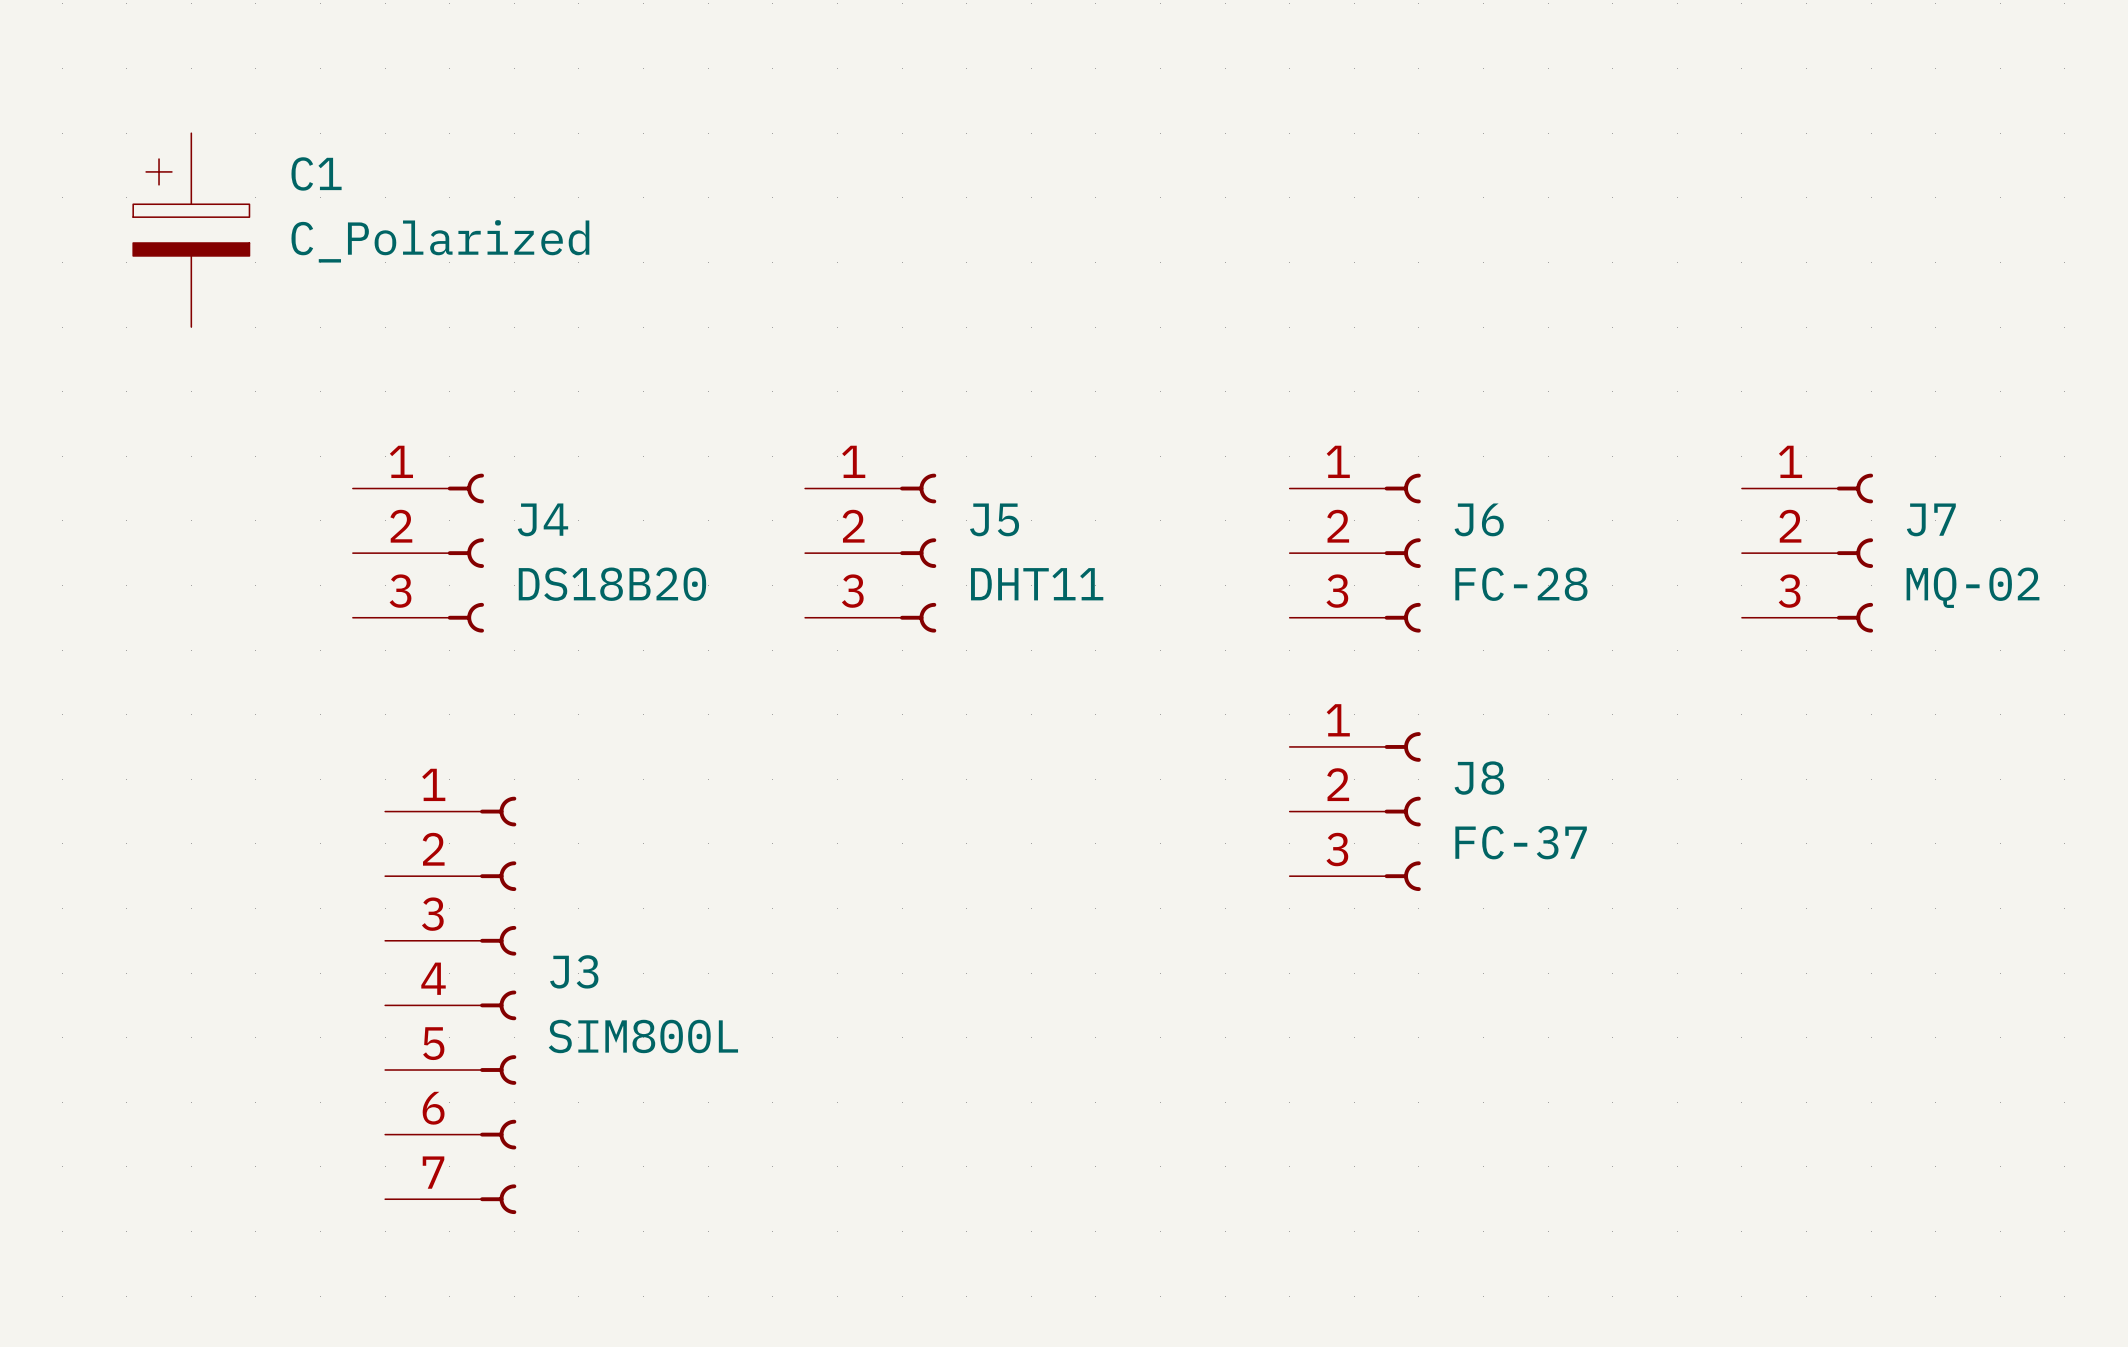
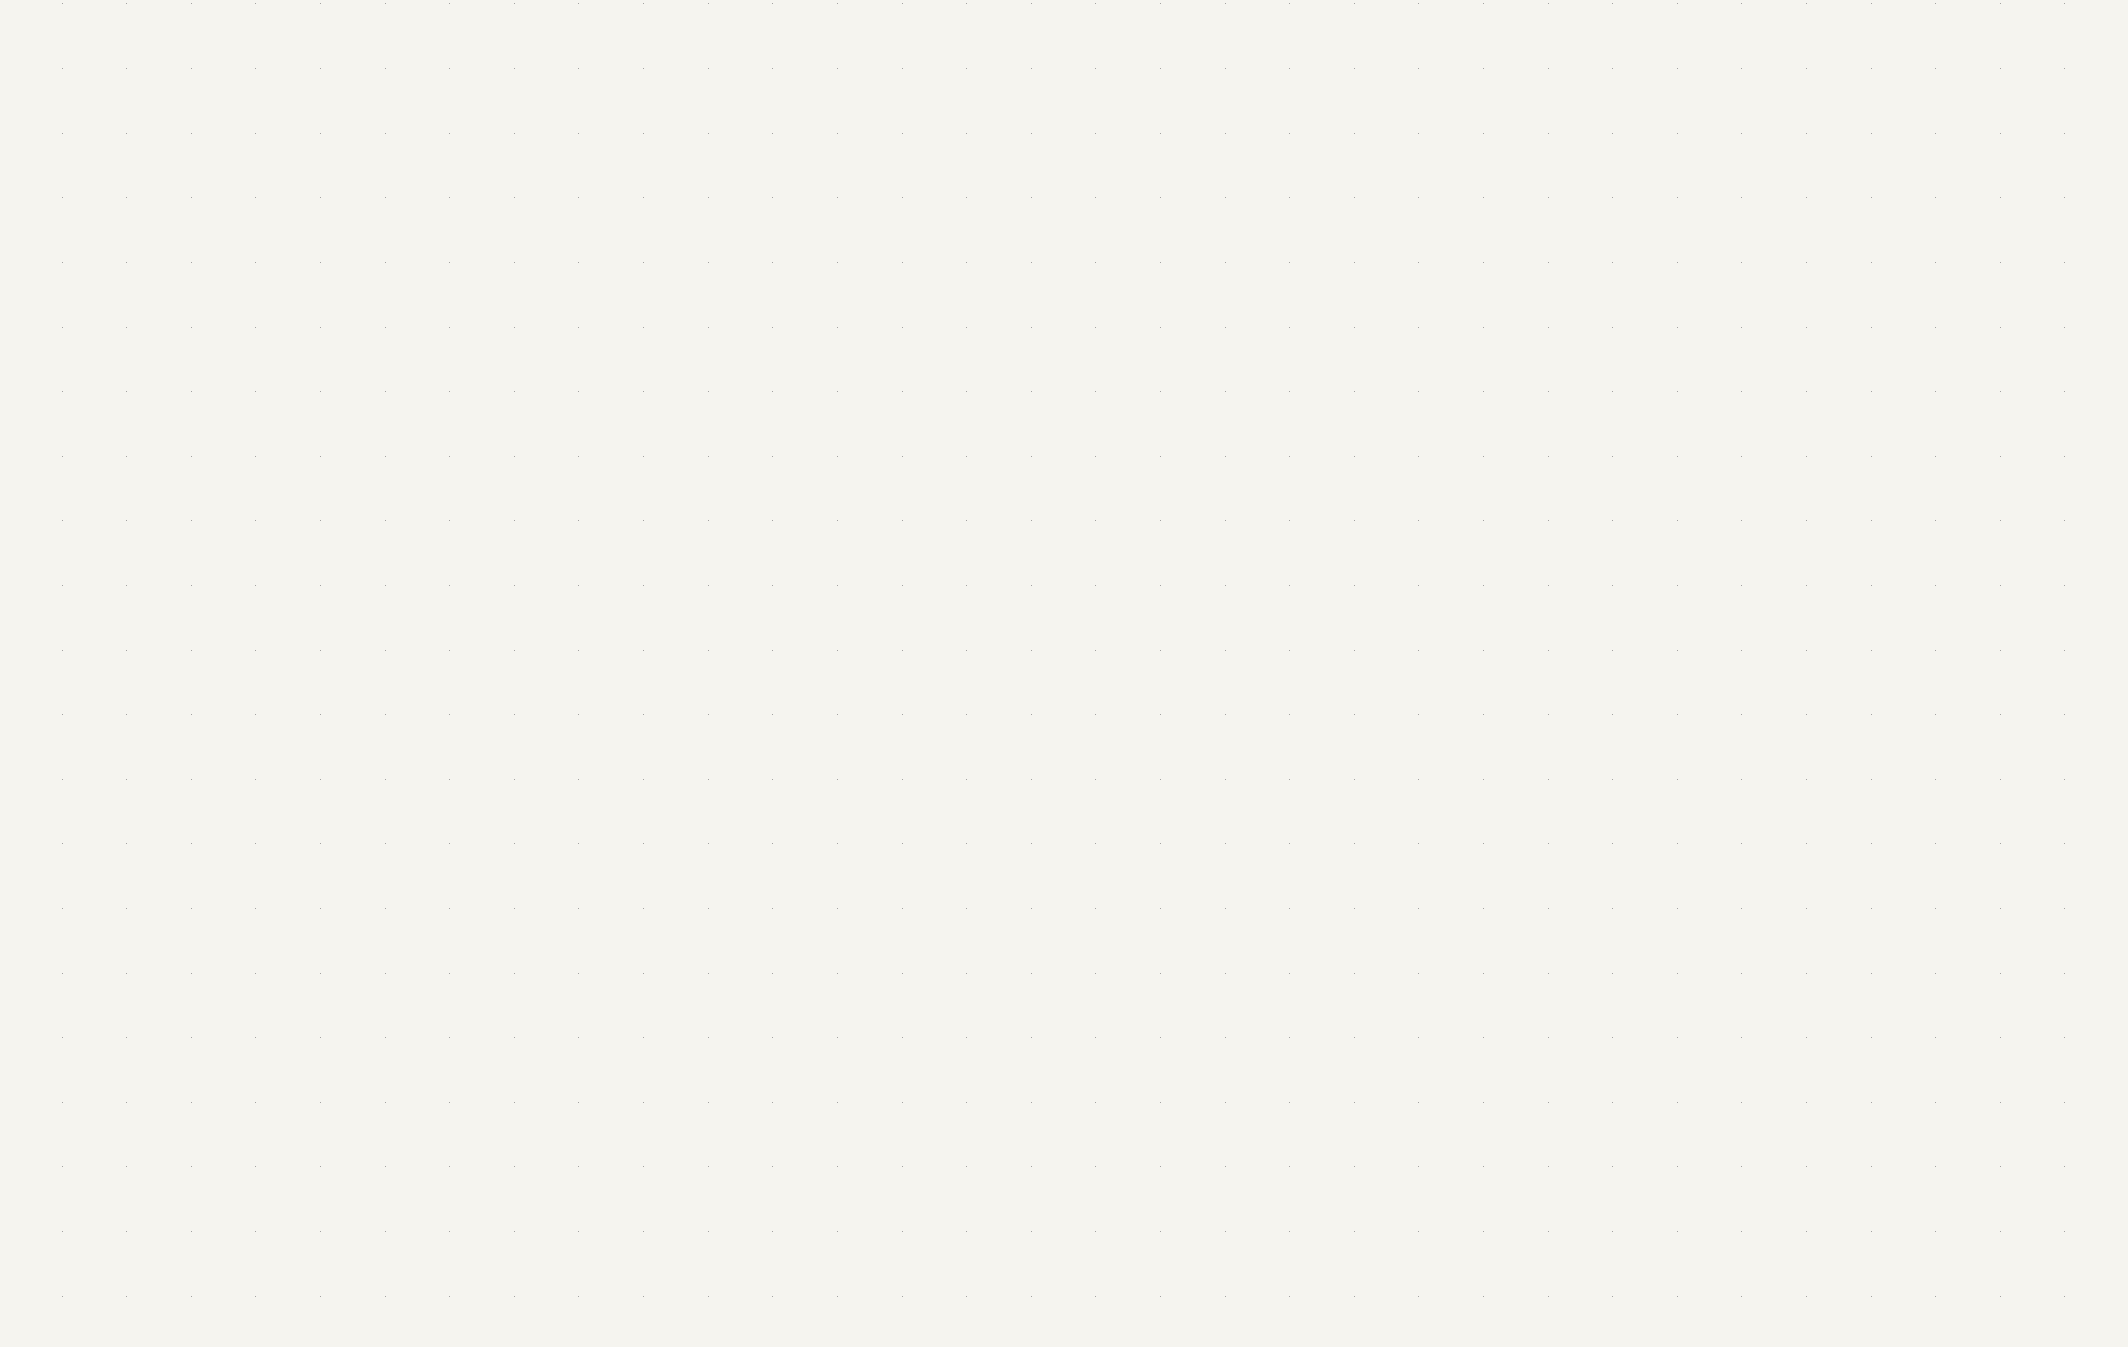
C1: C_Polarized (191, 230) -> none
J4: DS18B20 (418, 553) -> none
J5: DHT11 (870, 553) -> none
J6: FC-28 (1355, 553) -> none
J7: MQ-02 (1807, 553) -> none
J8: FC-37 (1355, 811) -> none
J3: SIM800L (450, 1005) -> none

